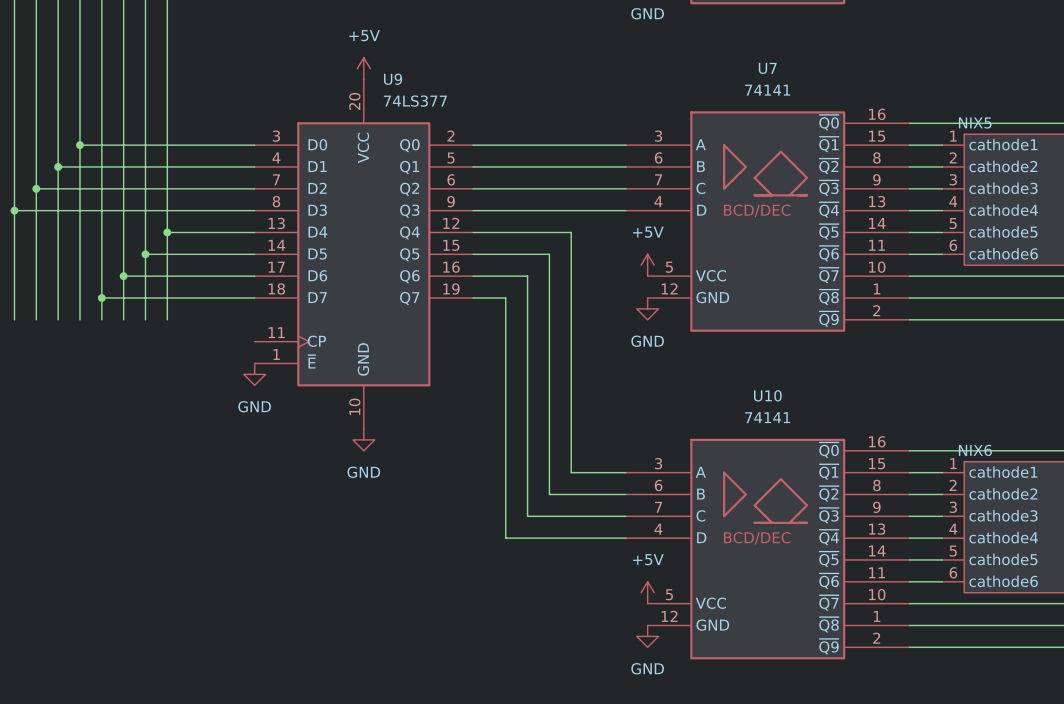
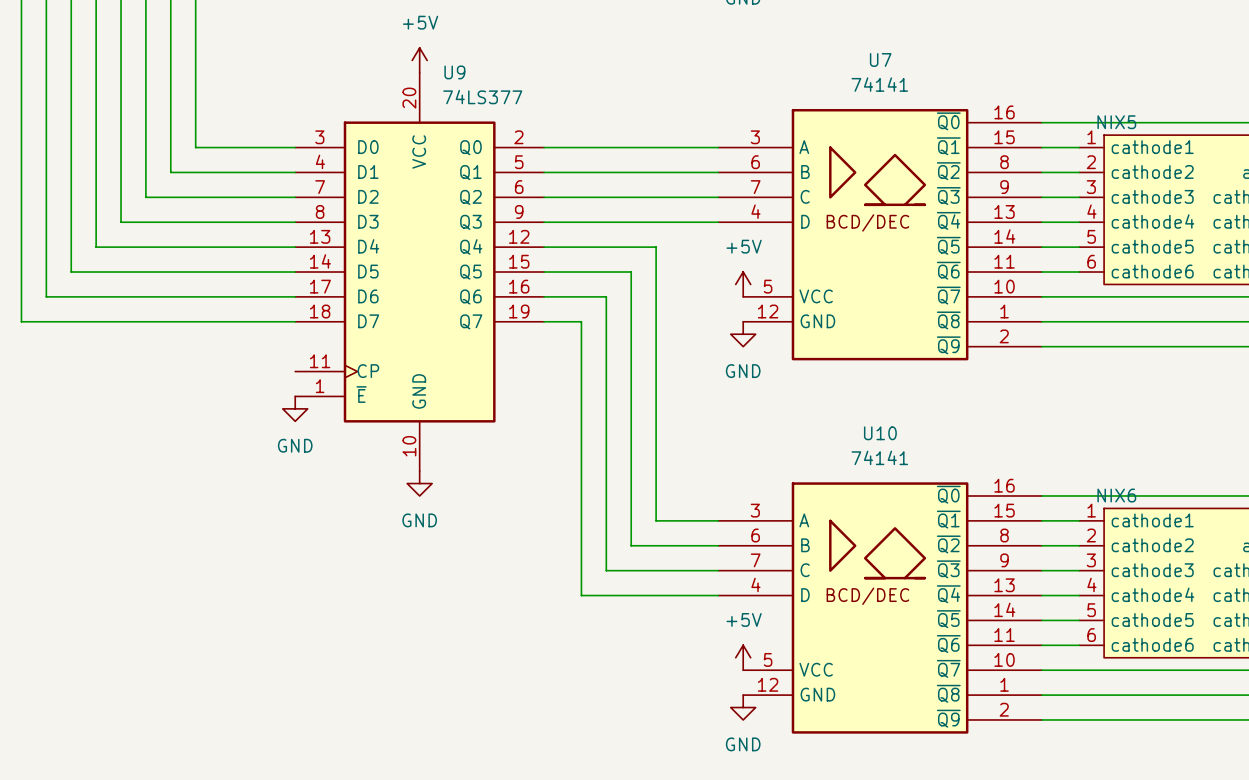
wire: (79, 145) (167, 145) (167, 319) -> none
junction: (79, 145) -> none
wire: (58, 166) (145, 166) (145, 319) -> none
junction: (58, 166) -> none
wire: (36, 188) (123, 188) (123, 319) -> none
junction: (36, 188) -> none
wire: (14, 210) (101, 210) (101, 319) -> none
junction: (14, 210) -> none
wire: (79, 232) (79, 319) -> (96, 247) (195, 247)
junction: (167, 232) -> none
wire: (58, 254) (58, 319) -> (71, 272) (170, 272)
junction: (145, 254) -> none
wire: (36, 276) (36, 319) -> (46, 296) (145, 296)
junction: (123, 276) -> none
wire: (14, 297) (14, 319) -> (21, 321) (121, 321)
junction: (101, 297) -> none

